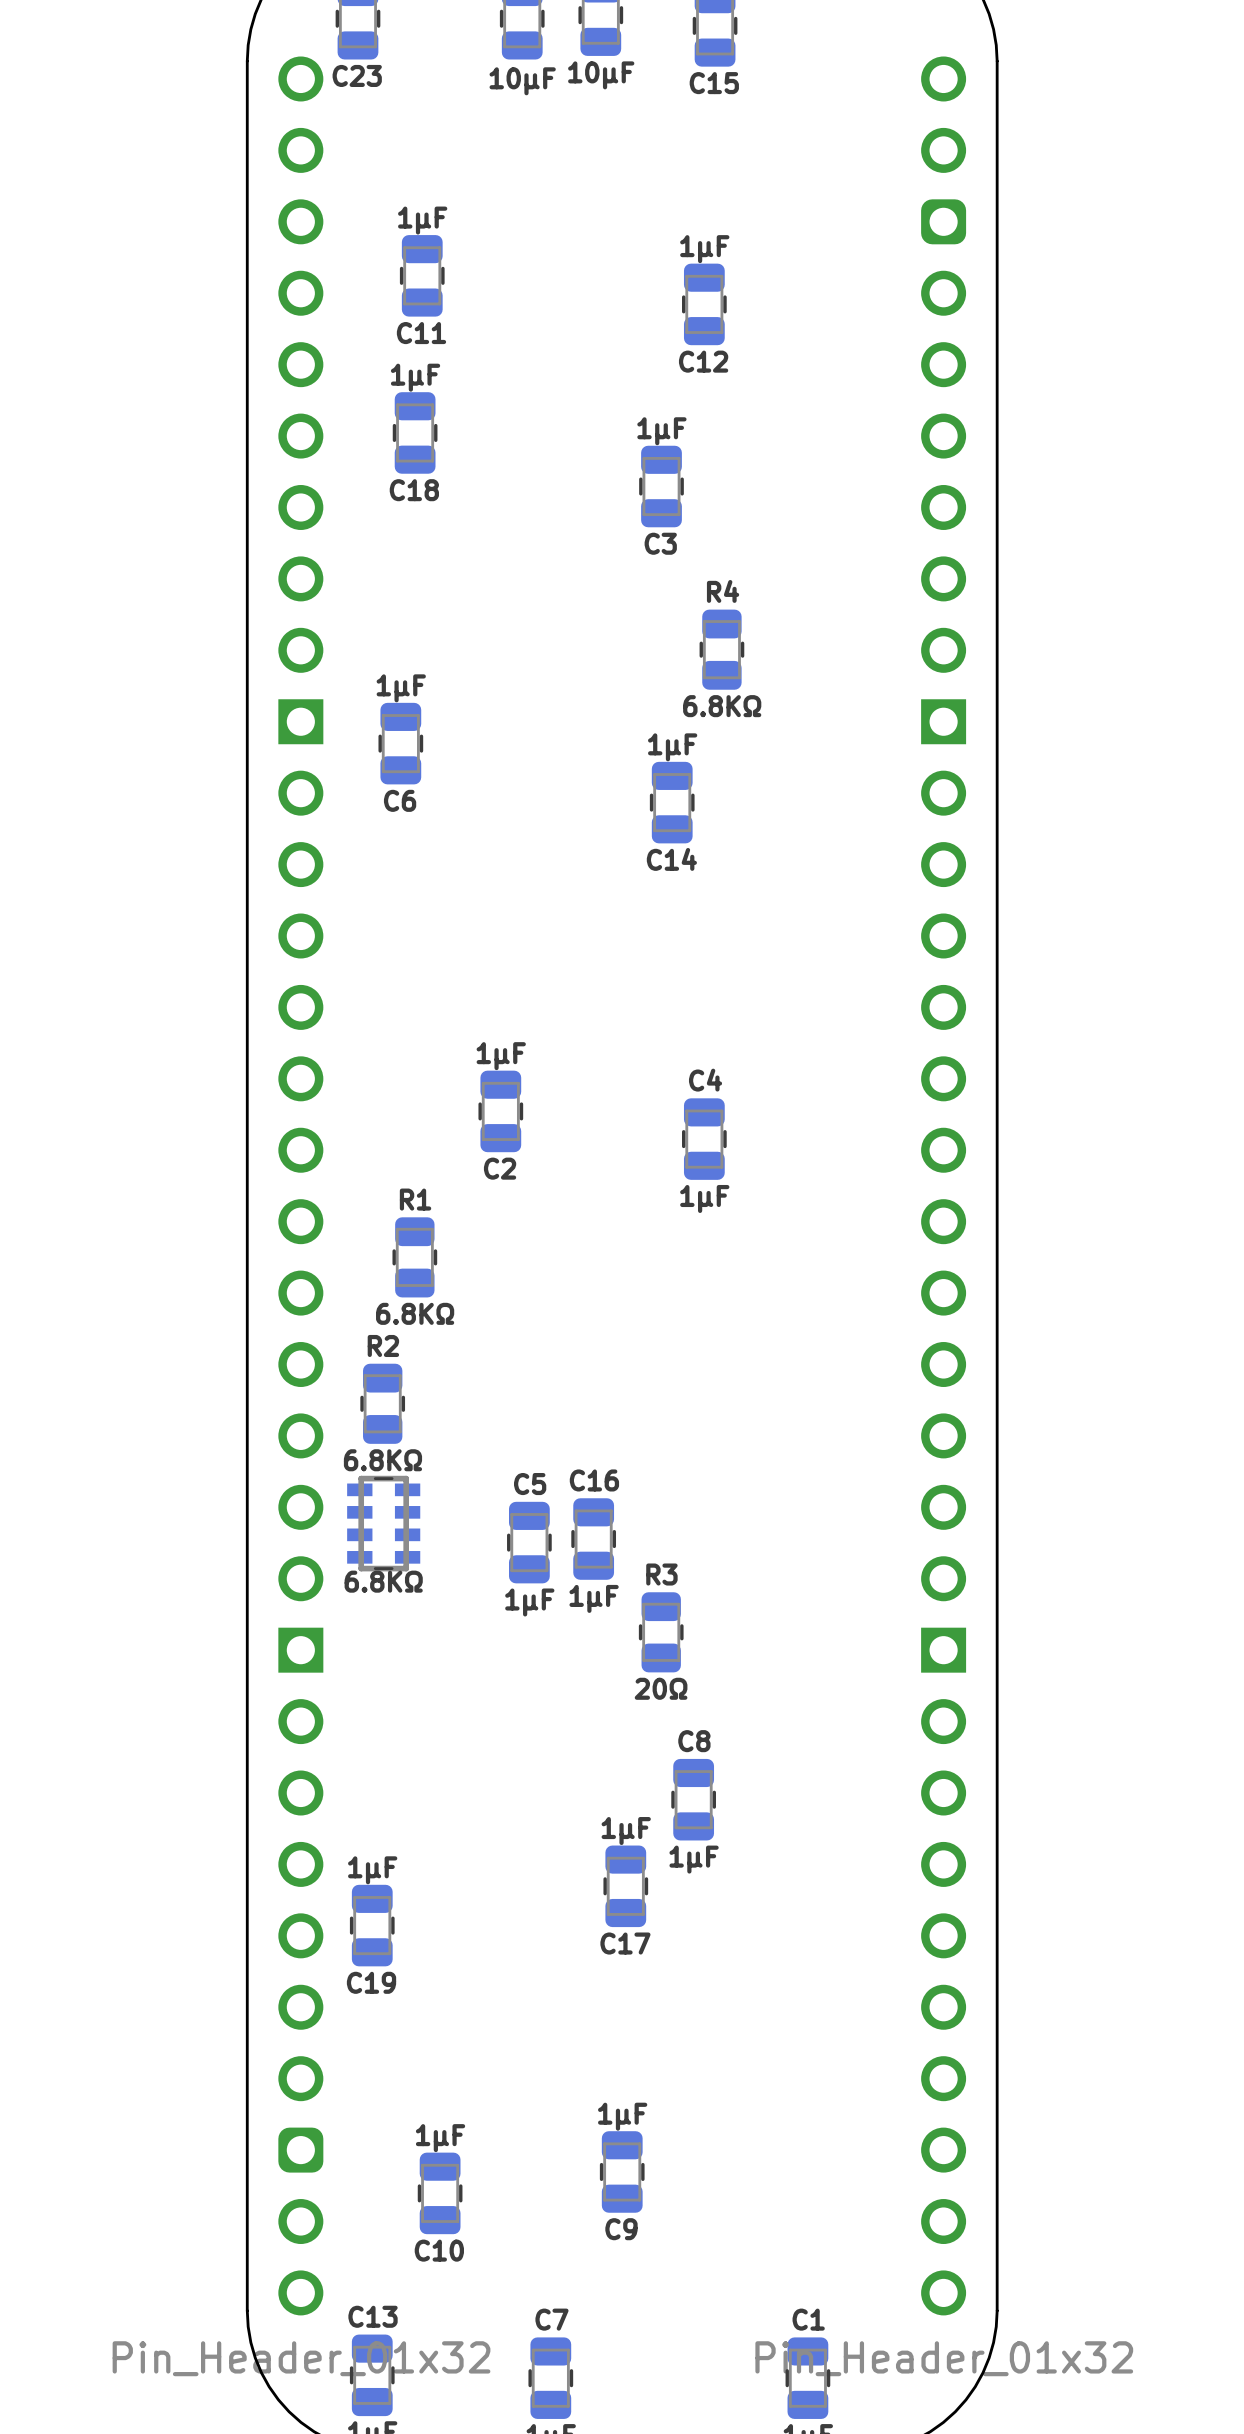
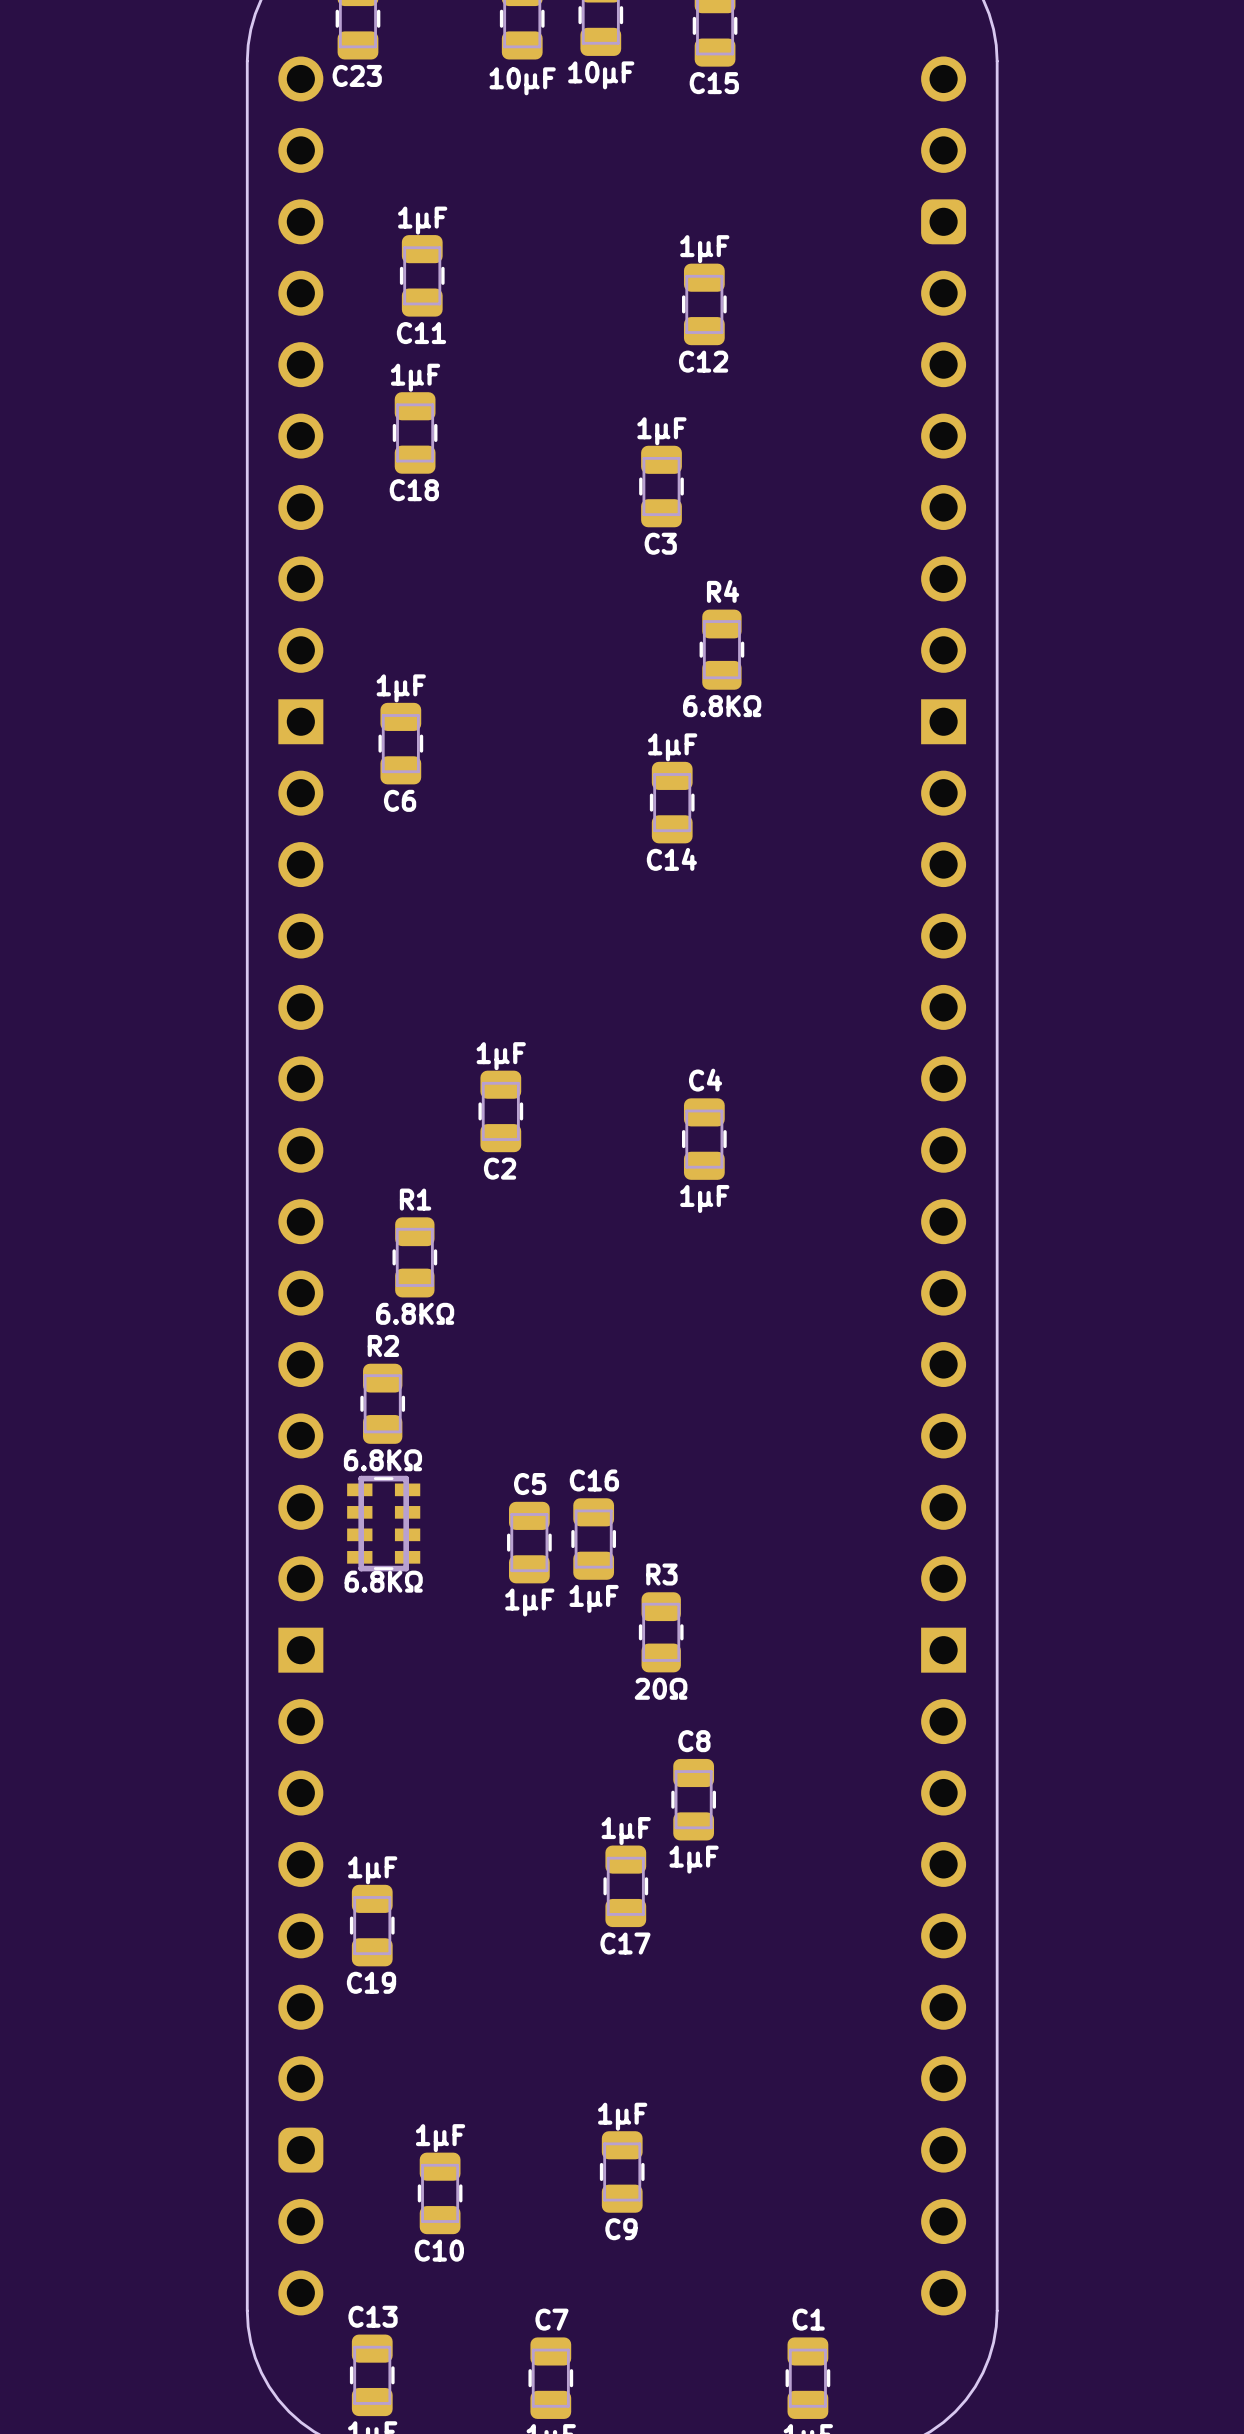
drawing: [112, 2341, 491, 2377] -> none
drawing: [755, 2341, 1134, 2377] -> none

